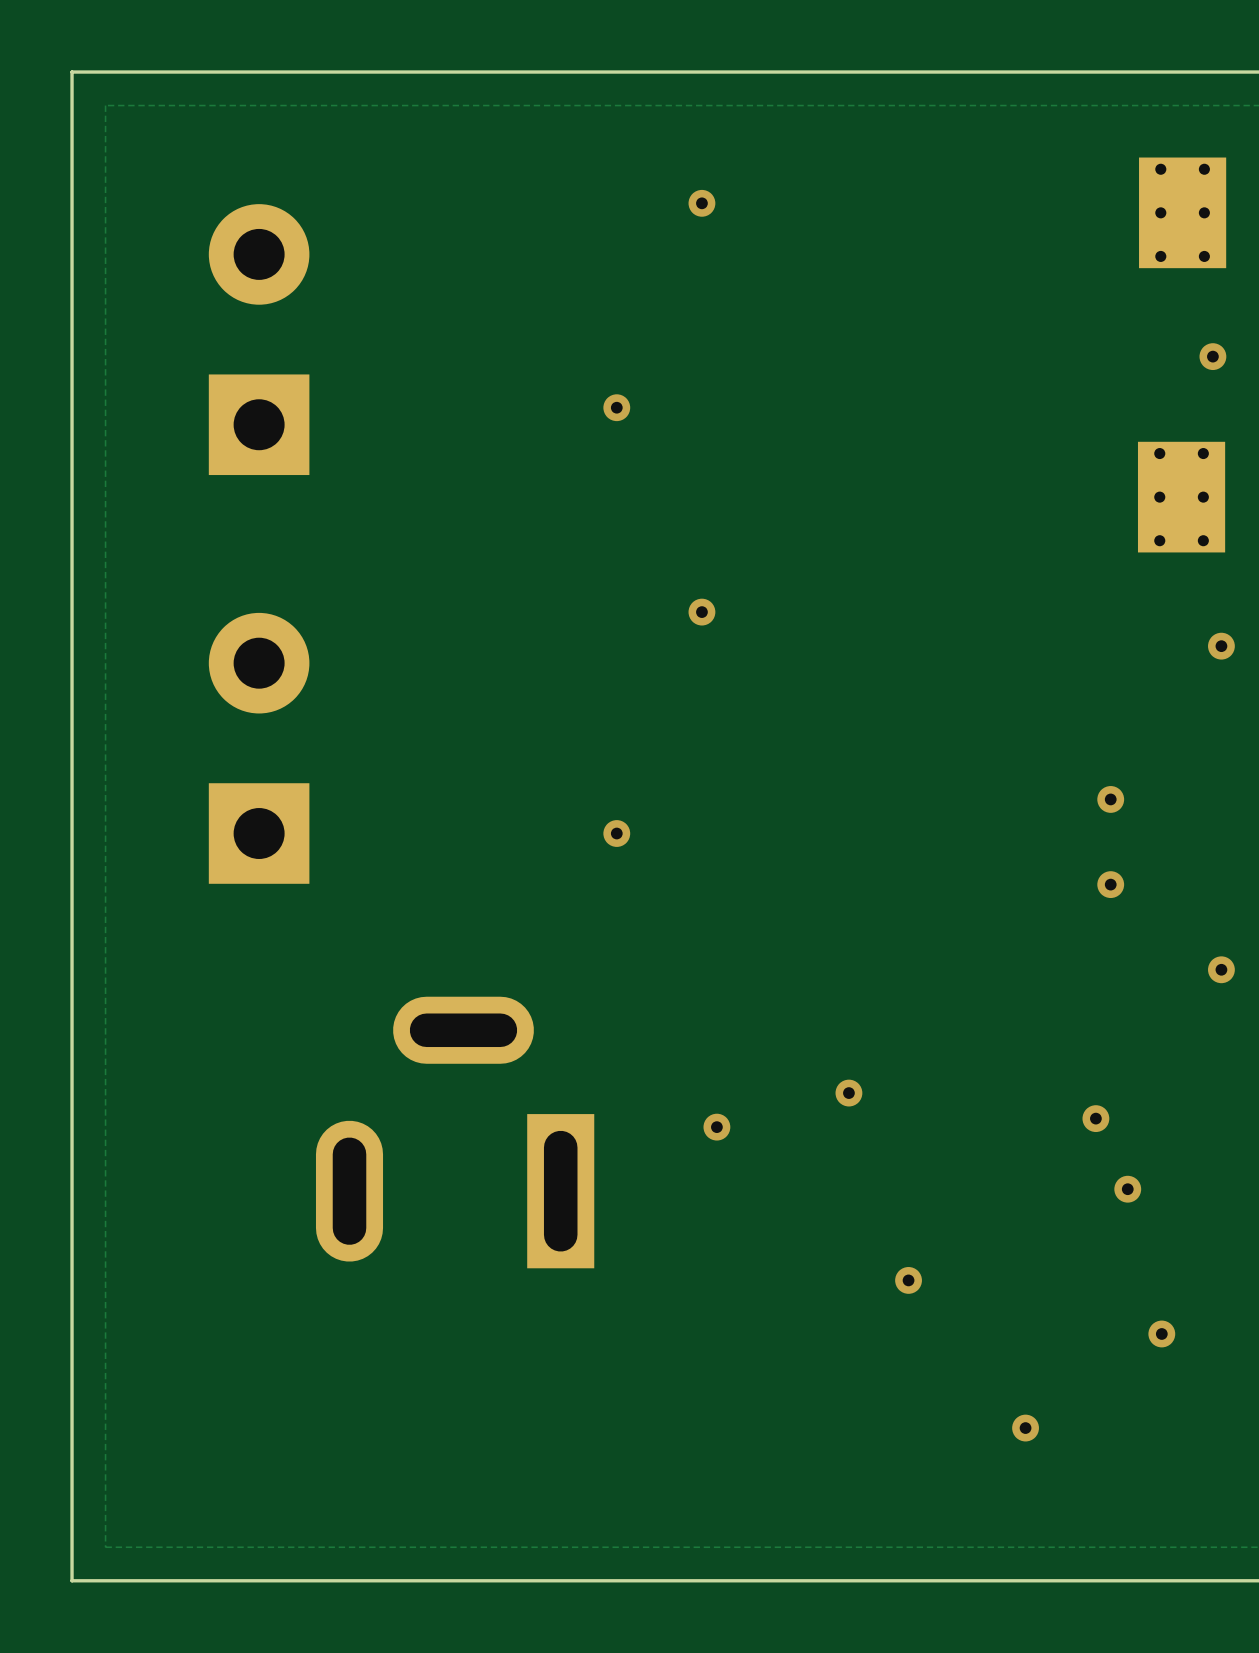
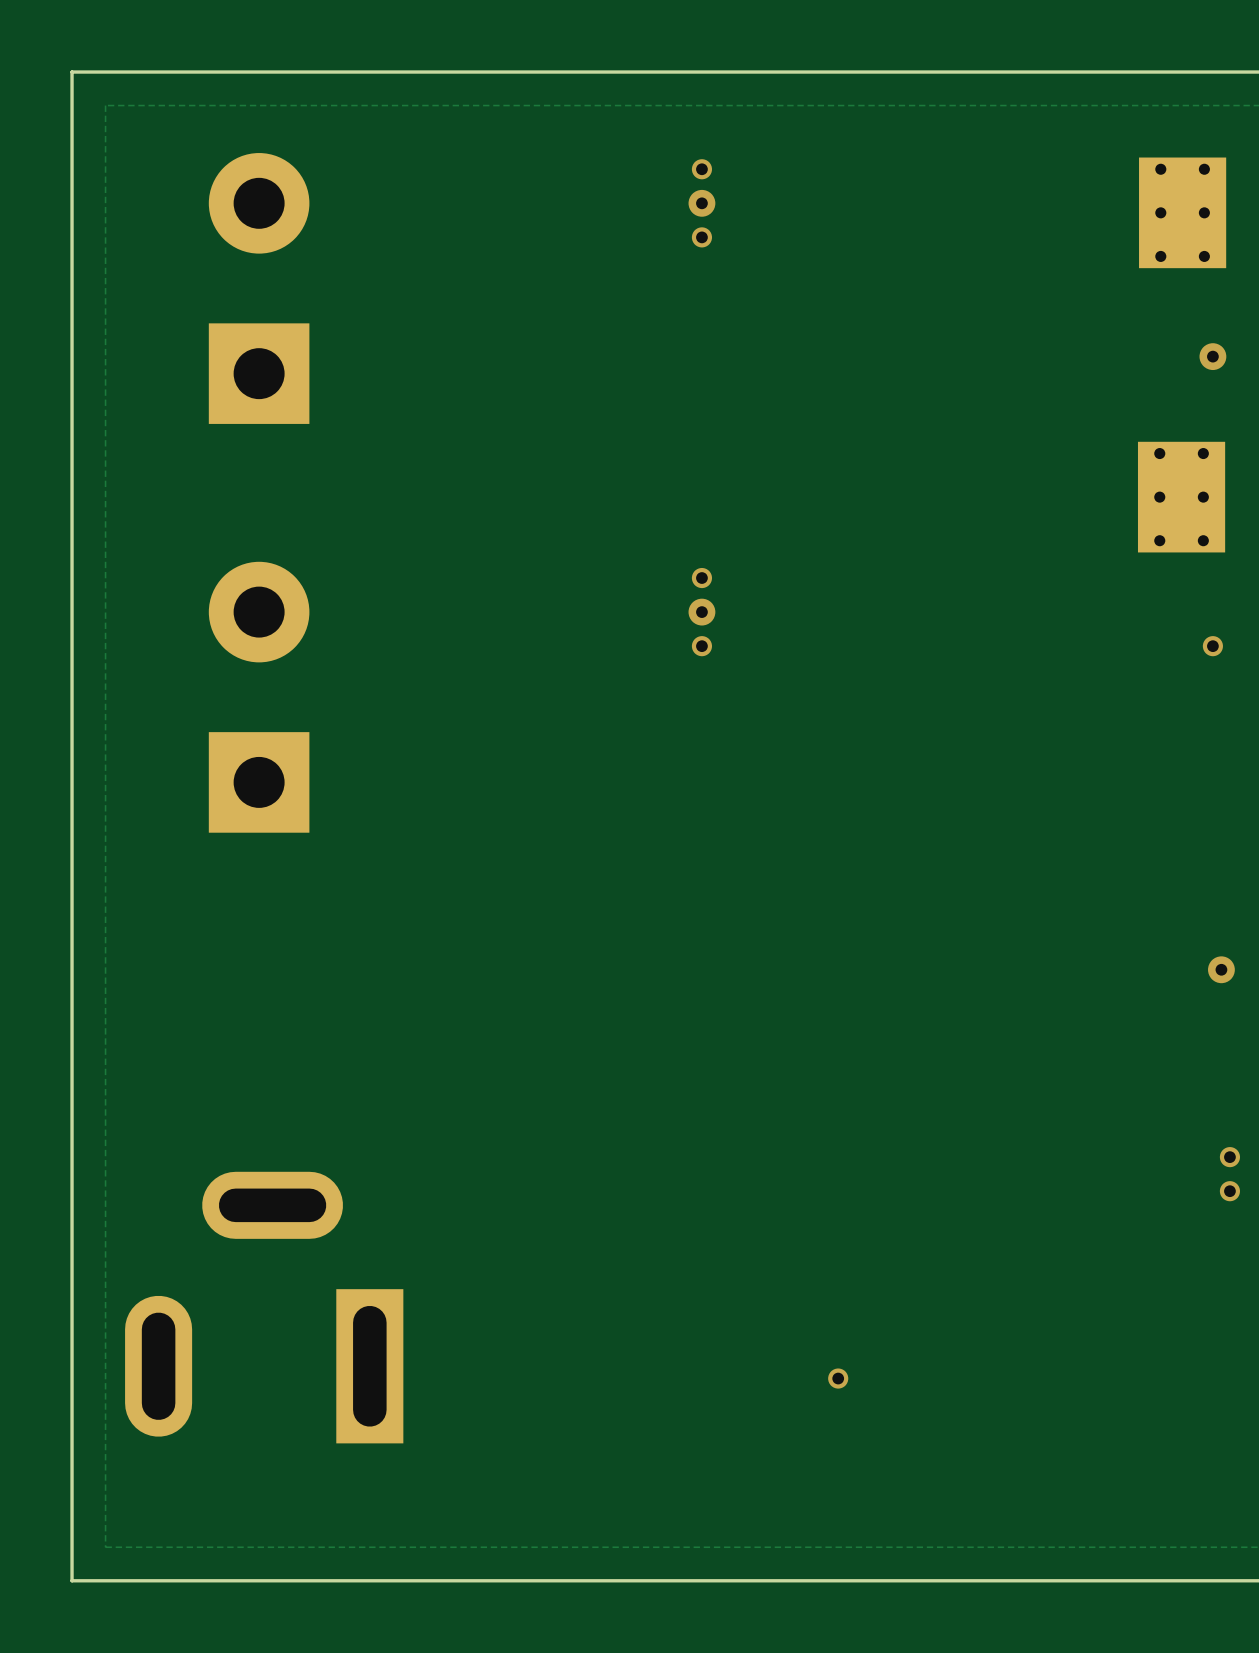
via: none -> (701, 169)
via: none -> (701, 237)
part position: (259, 339) -> (259, 288)
via: (616, 407) -> none
via: none -> (701, 578)
via size: [1208, 632, 1235, 660] -> [1202, 636, 1223, 657]
via: none -> (701, 646)
part position: (259, 748) -> (259, 697)
via: (1110, 799) -> none
via: (616, 833) -> none
via: (1110, 884) -> none
via: (848, 1093) -> none
via: (1095, 1118) -> none
via: (716, 1127) -> none
part position: (455, 1132) -> (264, 1307)
via: none -> (1229, 1157)
via: (1127, 1189) -> none
via: none -> (1229, 1191)
via: (908, 1280) -> none
via: (1161, 1333) -> none
via: none -> (838, 1378)
via: (1025, 1428) -> none

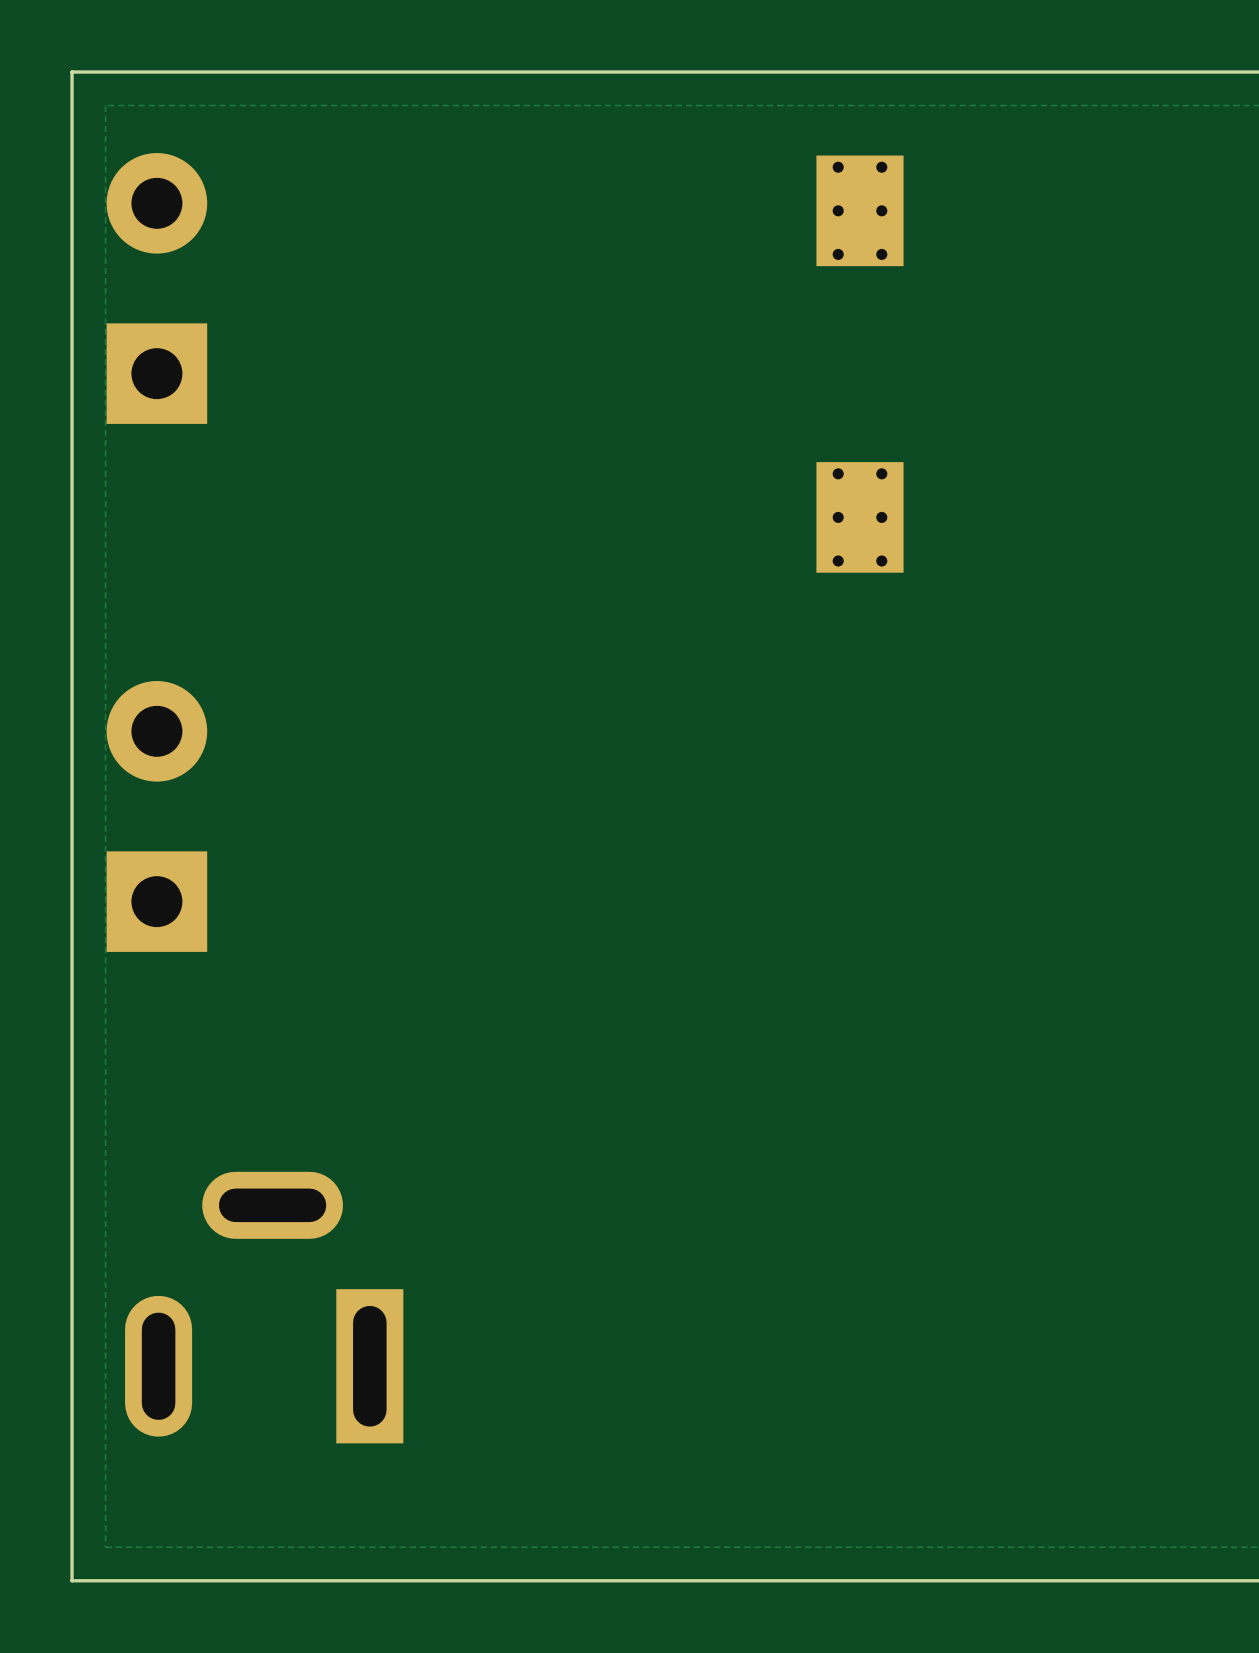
via: (701, 169) -> none
via: (701, 203) -> none
part: none -> (860, 210)
part: (1182, 212) -> none
via: (701, 237) -> none
part position: (259, 288) -> (156, 288)
via: (1212, 356) -> none
part: (1181, 497) -> none
part: none -> (860, 517)
via: (701, 578) -> none
via: (701, 612) -> none
via: (701, 646) -> none
via: (1212, 646) -> none
part position: (259, 697) -> (156, 816)
via: (1221, 969) -> none
via: (1229, 1157) -> none
via: (1229, 1191) -> none
via: (838, 1378) -> none

